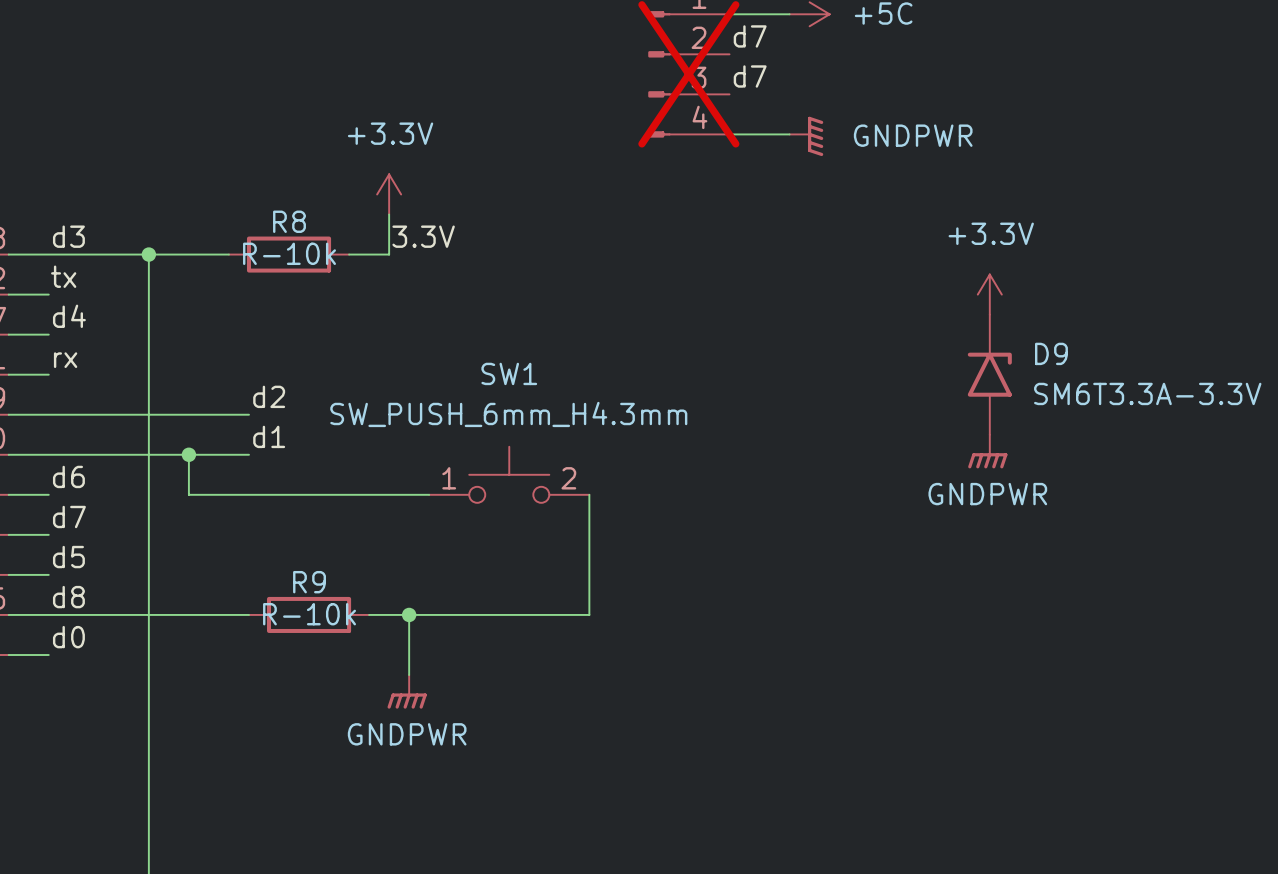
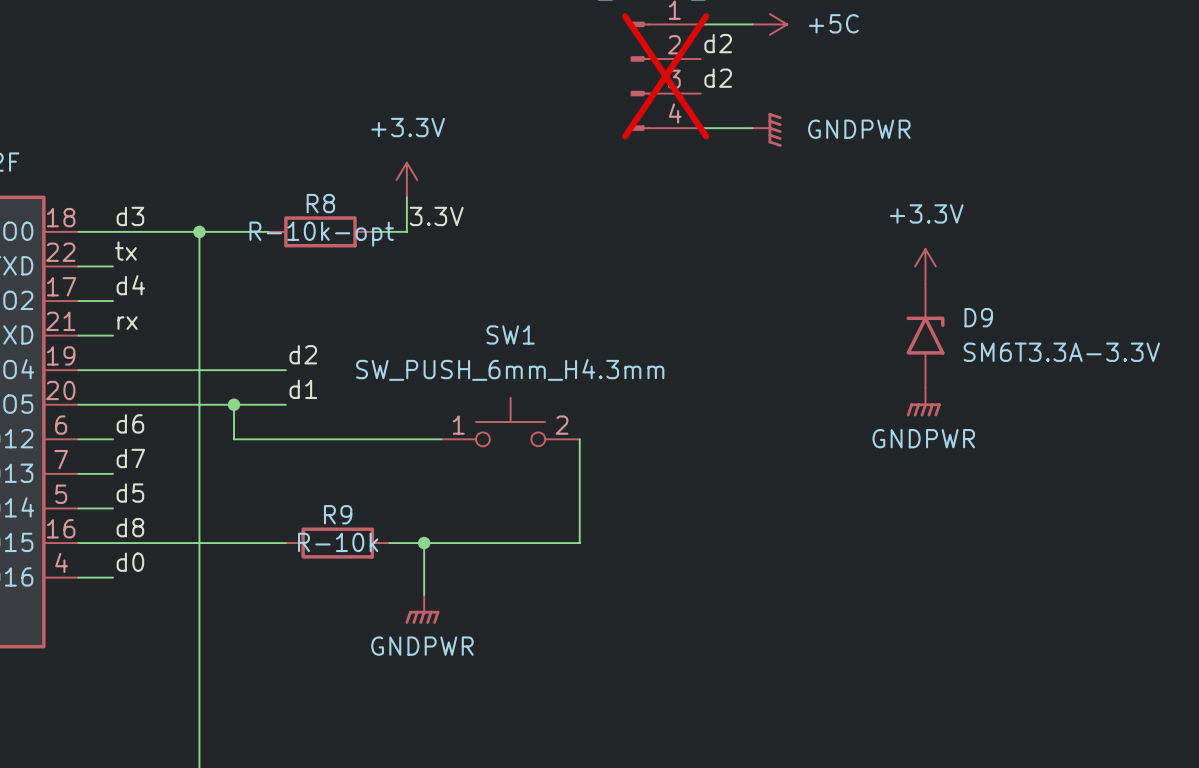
label: d7 (750, 36) -> d2 (718, 43)
label: d7 (750, 76) -> d2 (718, 78)
R8 value: R-10k (289, 253) -> R-10k-opt (321, 234)

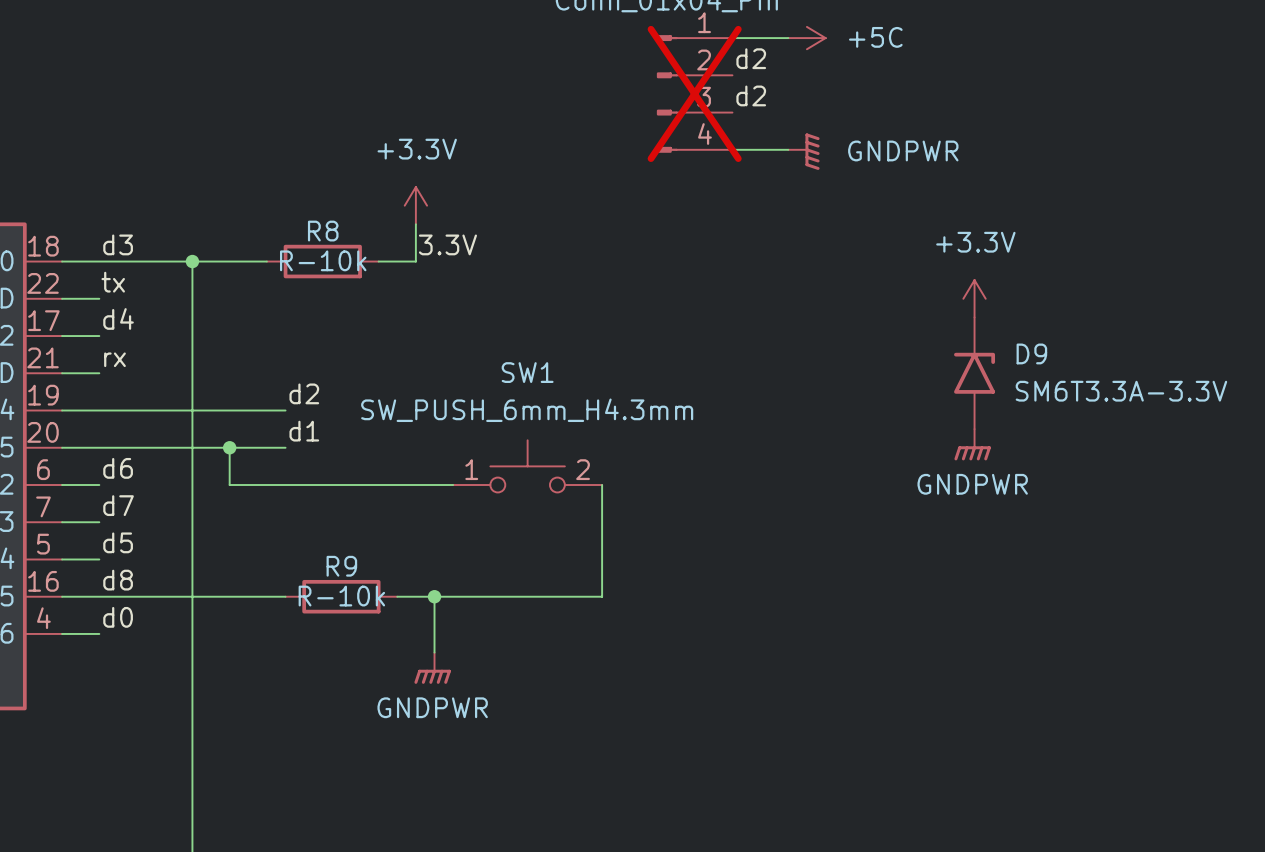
R8 value: R-10k-opt (321, 234) -> R-10k (323, 260)

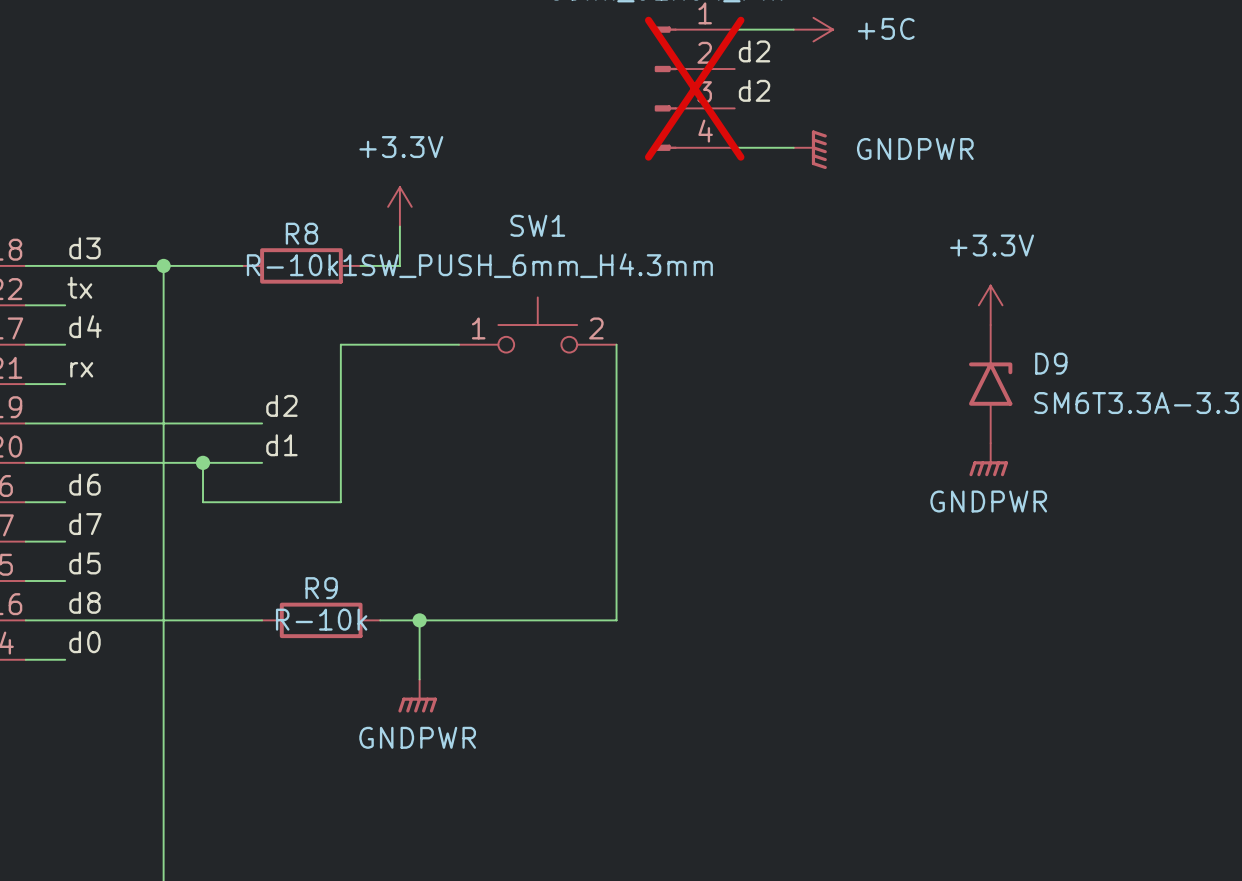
label: 3.3V (447, 244) -> none
R8 value: R-10k (323, 260) -> R-10k1 (301, 265)
SW1 position: (527, 466) -> (537, 325)
wire: (360, 485) (453, 485) -> (340, 502) (340, 344) (459, 344)
wire: (602, 485) (602, 596) -> (616, 344) (616, 620) (596, 620)

